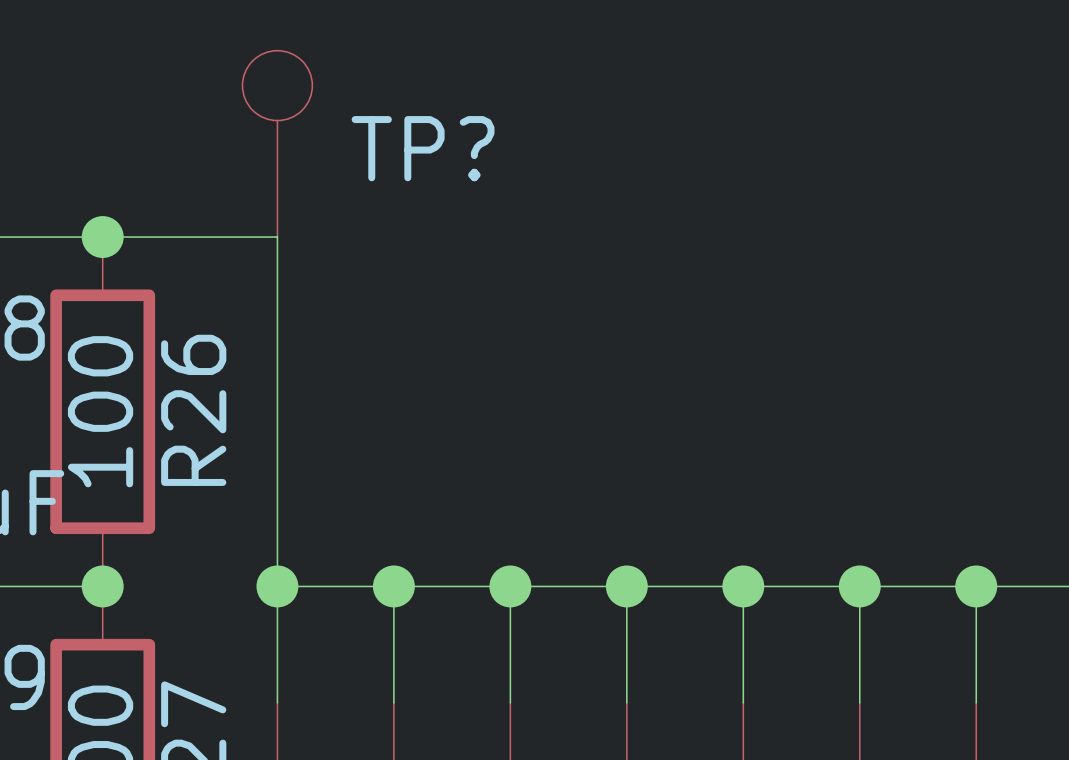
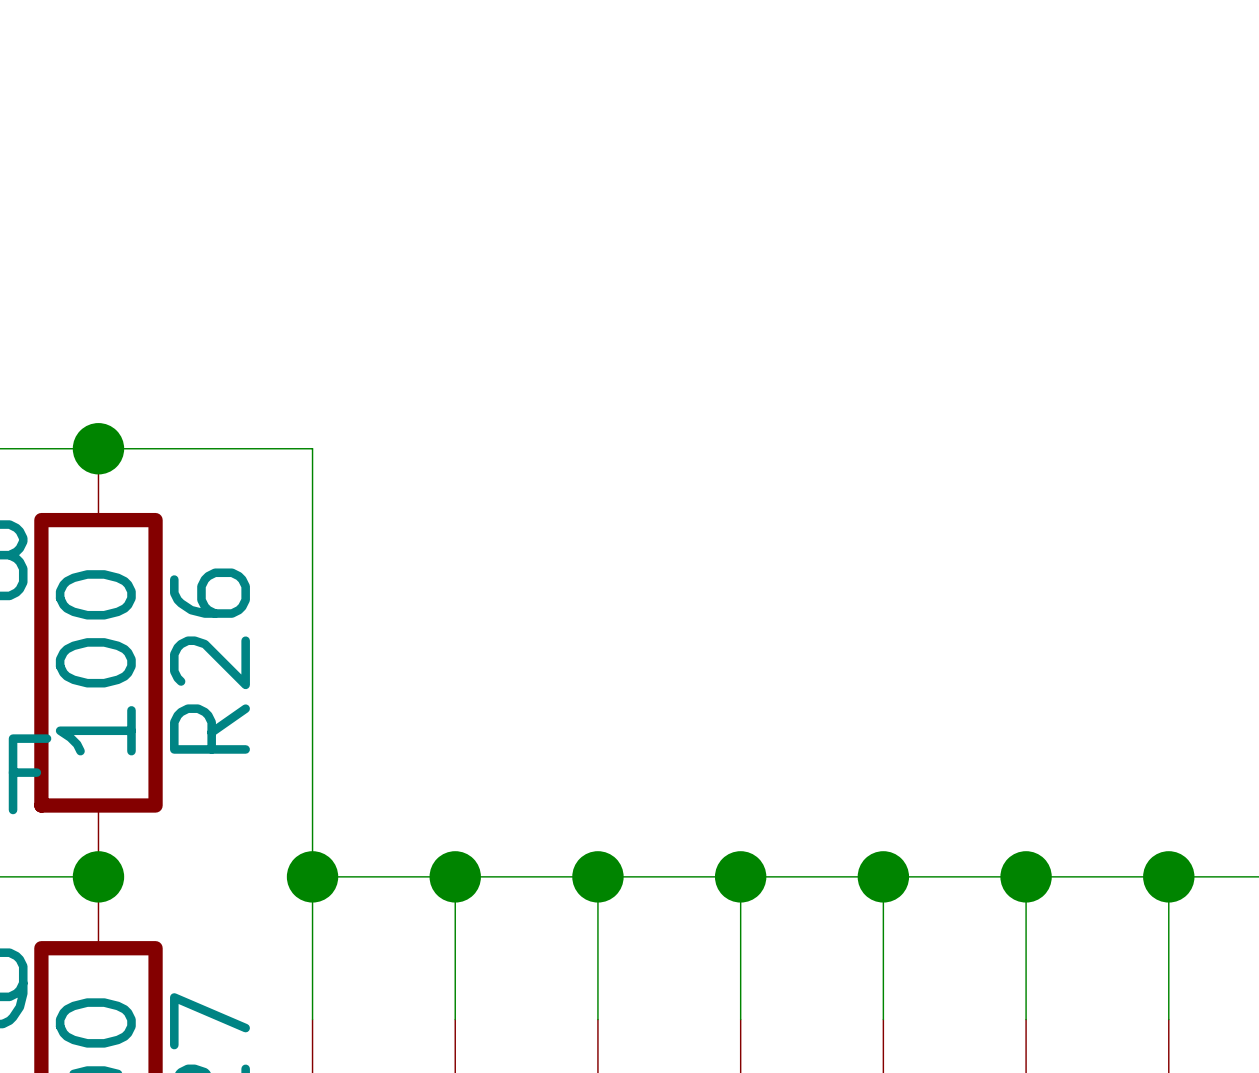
TP?: (277, 143) -> none

